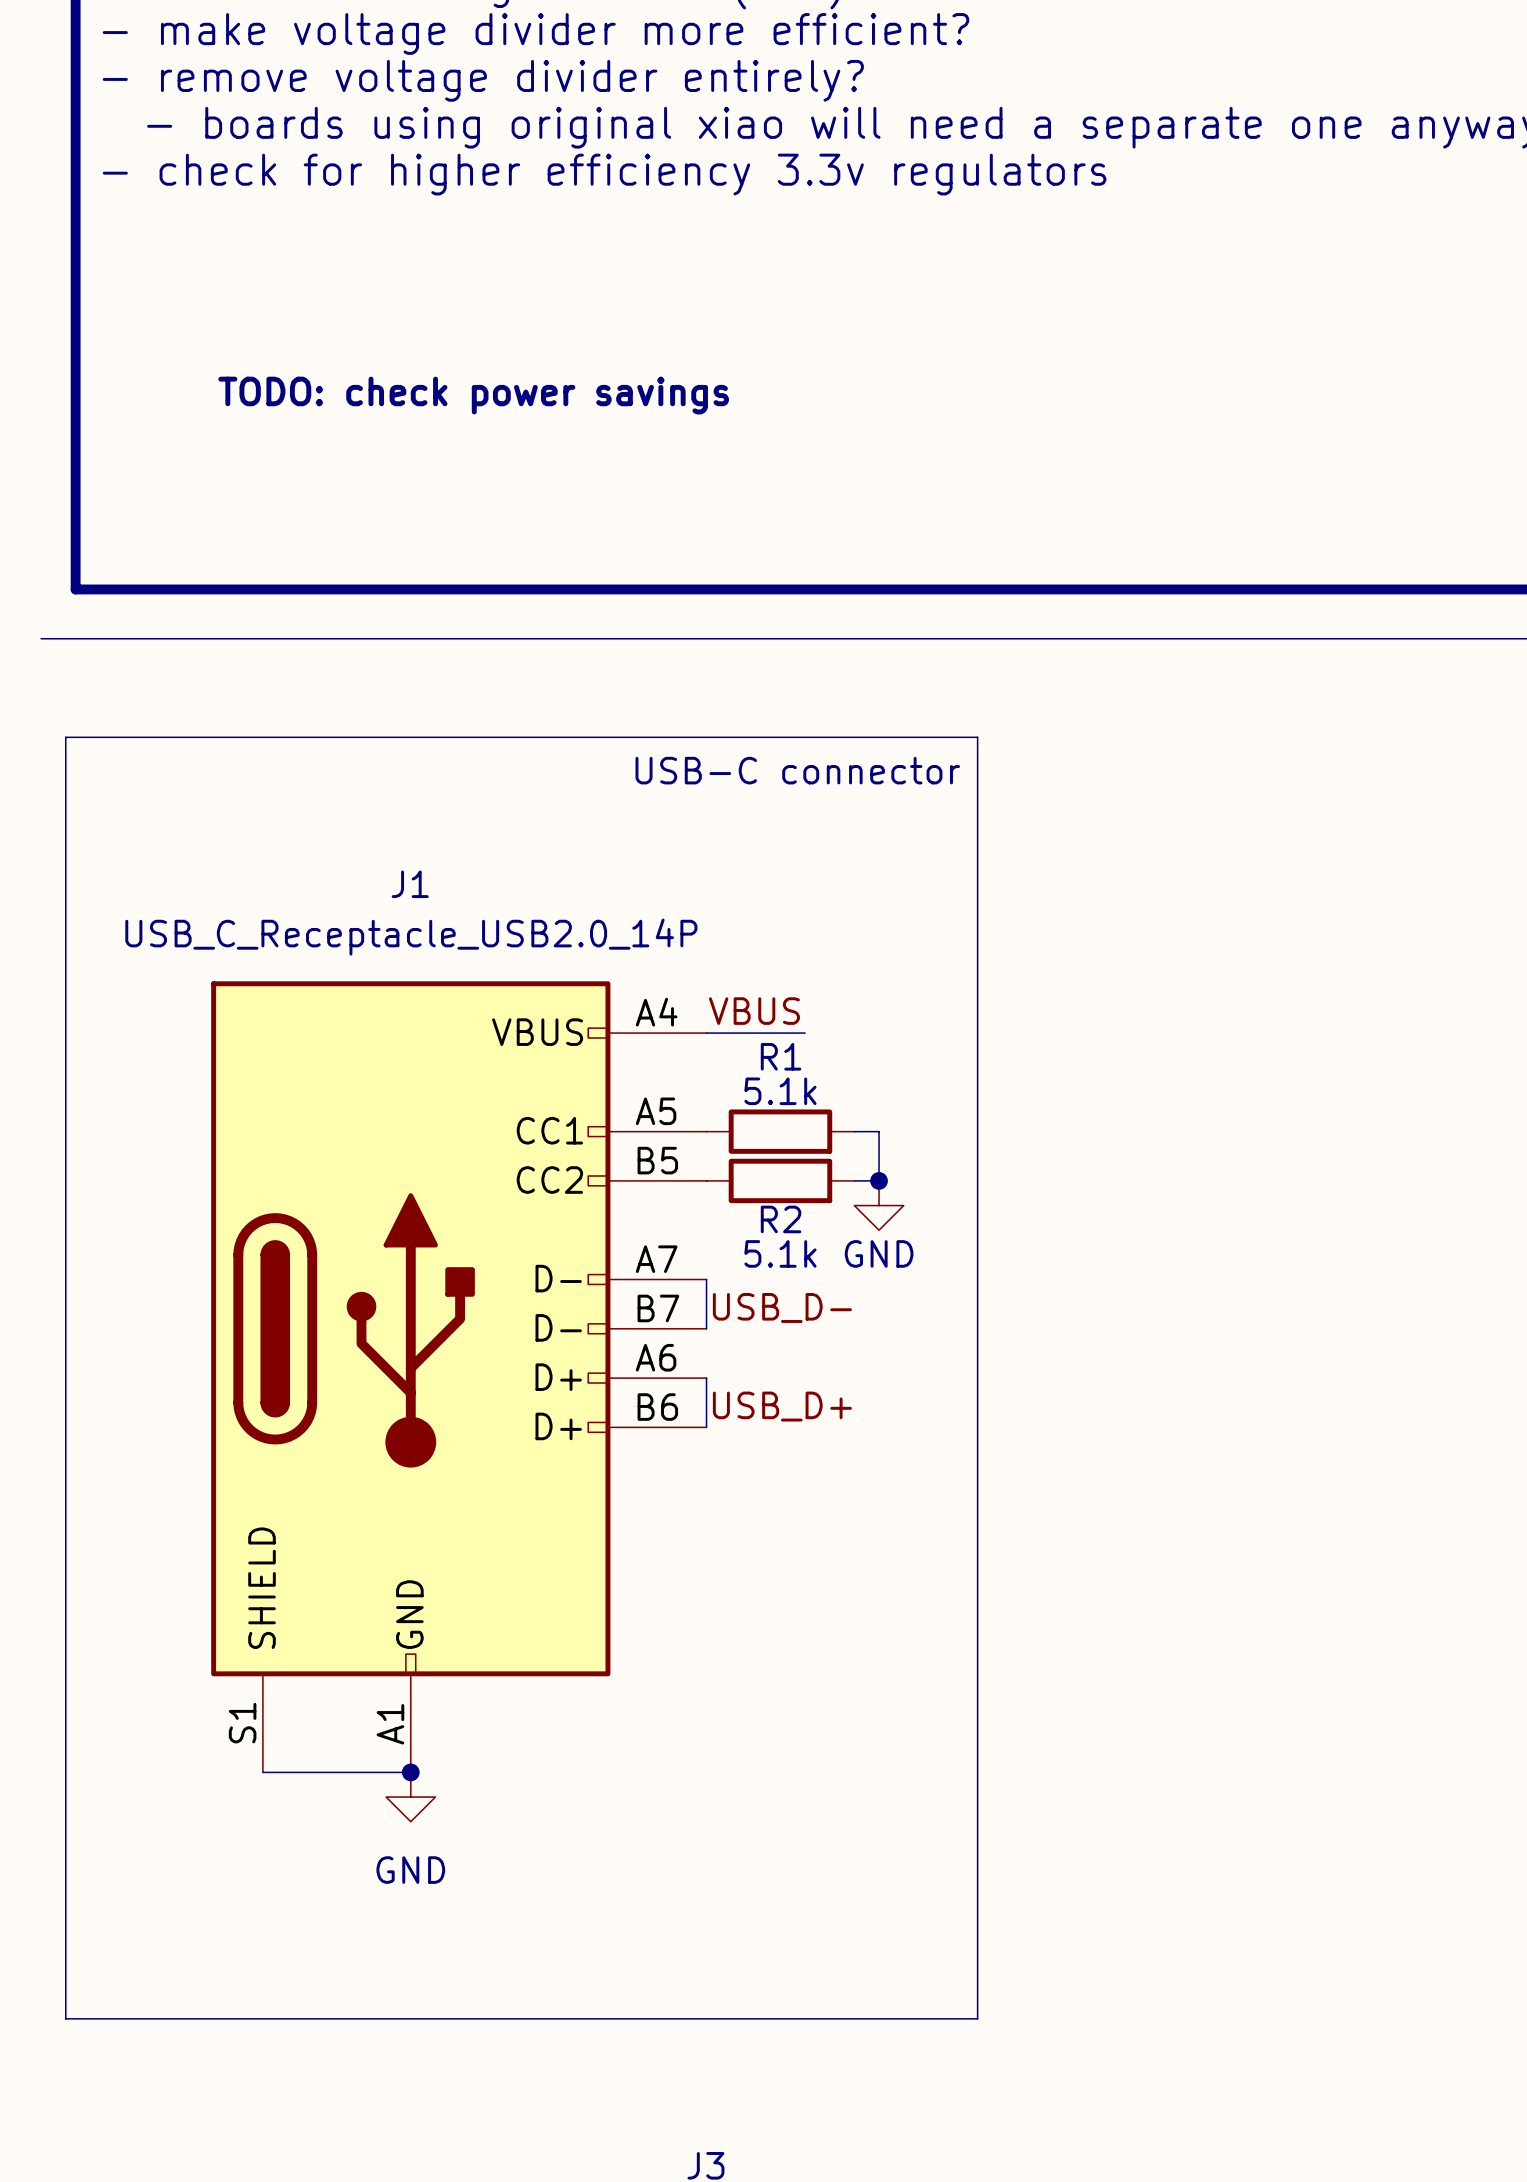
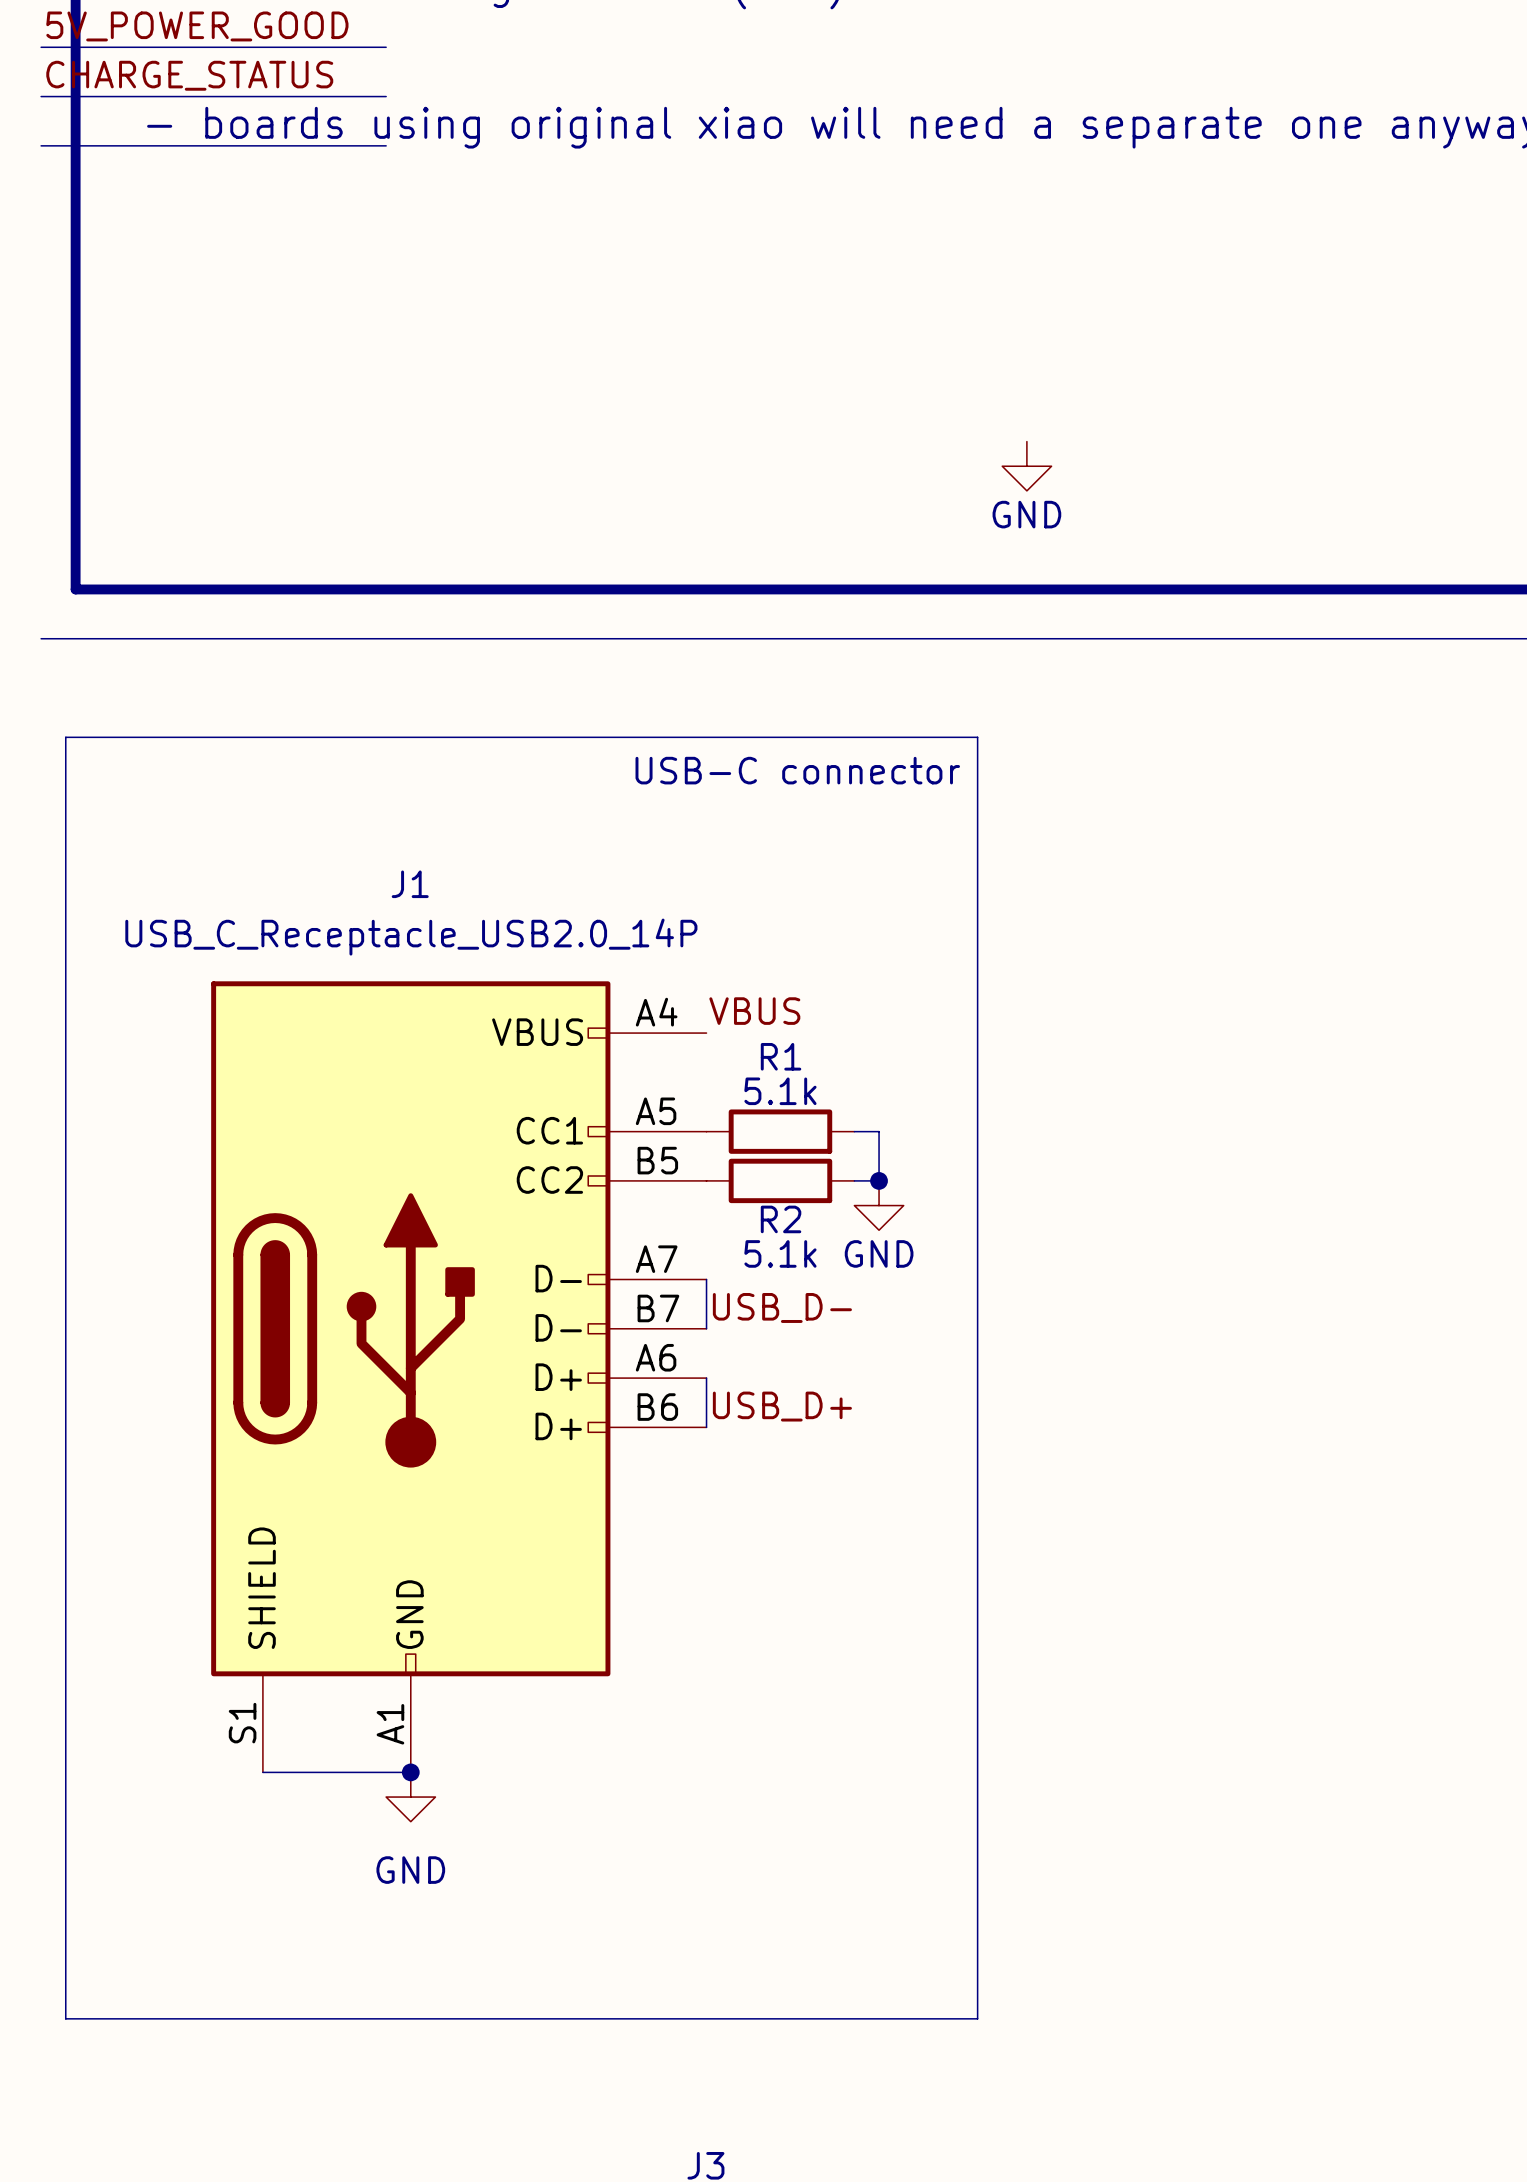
label: none -> 5V_POWER_GOOD (197, 26)
text: - make voltage divider more efficient? (535, 33) -> none
wire: none -> (41, 47) (386, 47)
label: none -> CHARGE_STATUS (189, 75)
text: - remove voltage divider entirely? (483, 80) -> none
wire: none -> (41, 96) (386, 96)
wire: none -> (41, 145) (386, 145)
text: - check for higher efficiency 3.3v regulators (604, 174) -> none
text: TODO: check power savings (473, 395) -> none
power symbol: none -> GND (1026, 466)
label position: VBUS (754, 1011) -> VBUS (754, 1011)
wire: (706, 1033) (805, 1033) -> none

